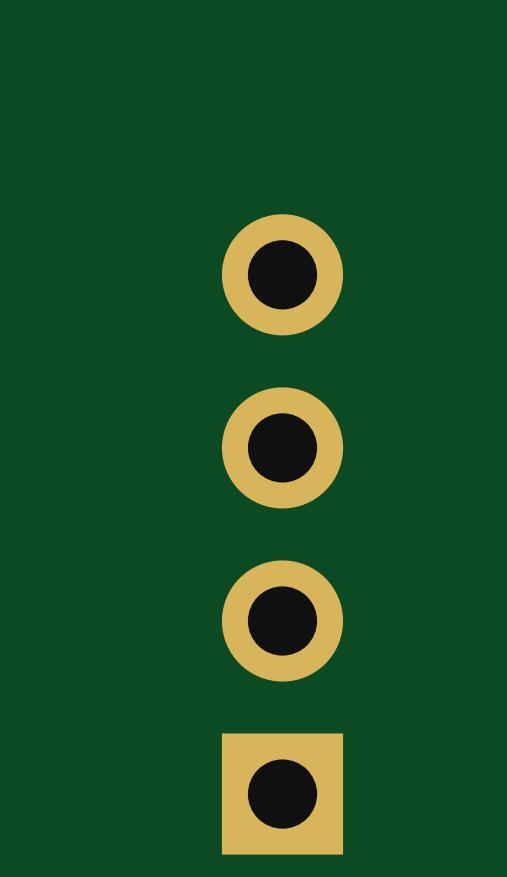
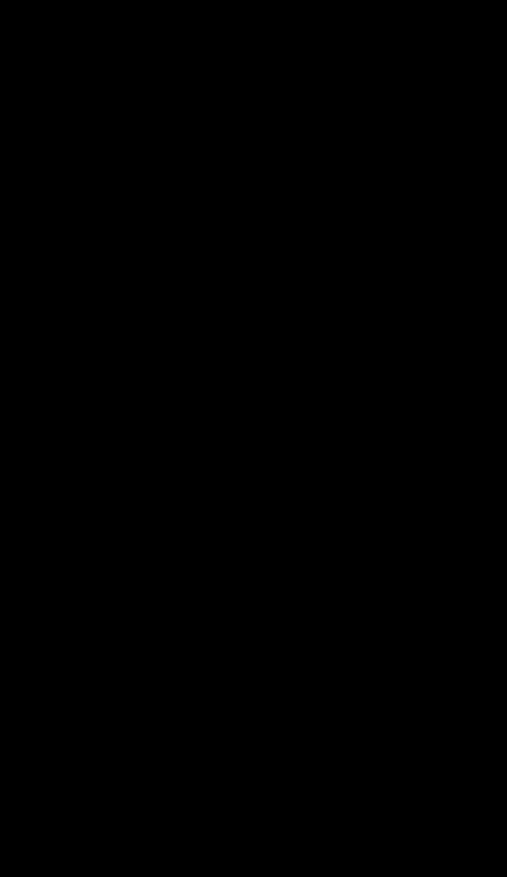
part: (282, 534) -> none

